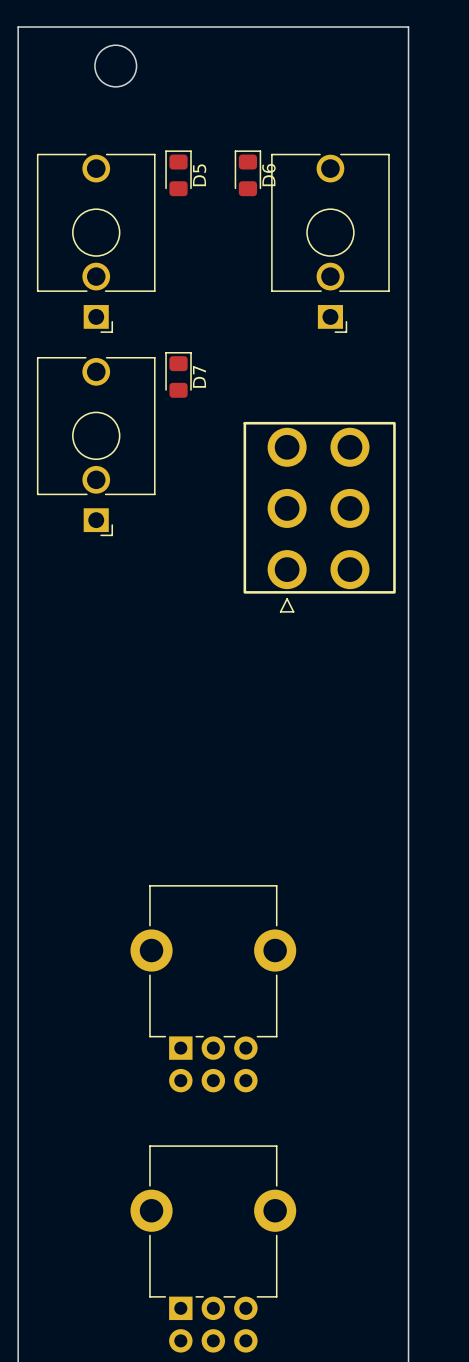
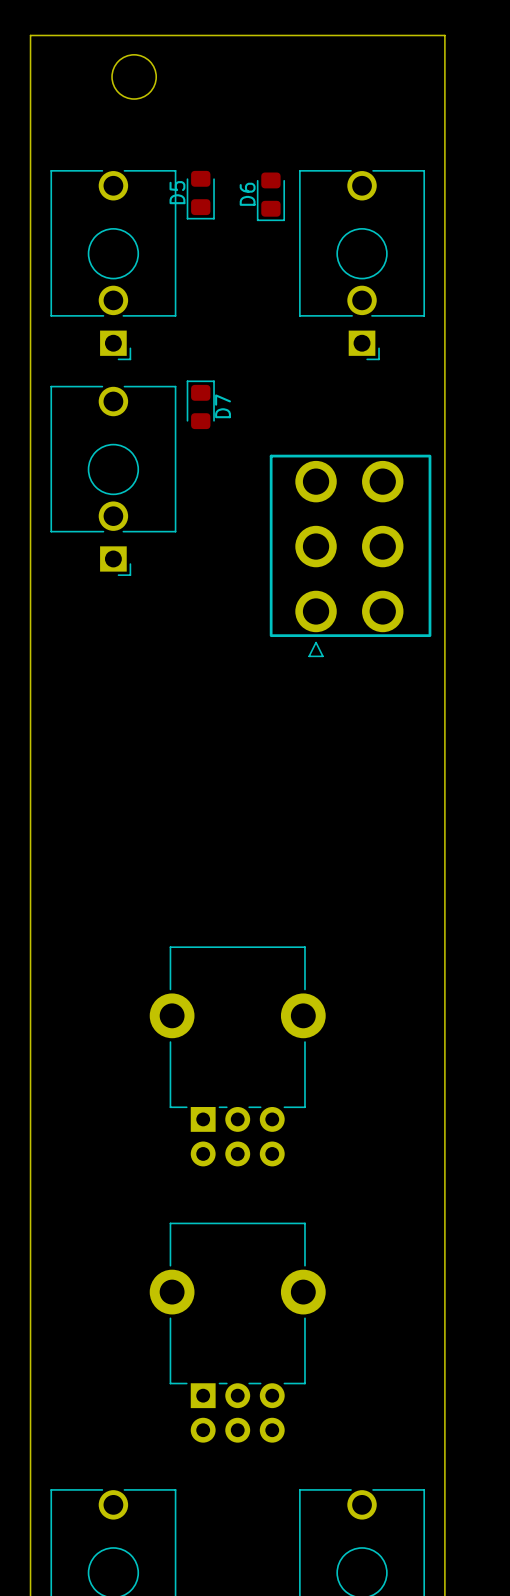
D5 rotation: 0° (178, 173) -> 180° (200, 195)
D6 rotation: 0° (247, 173) -> 180° (270, 196)

